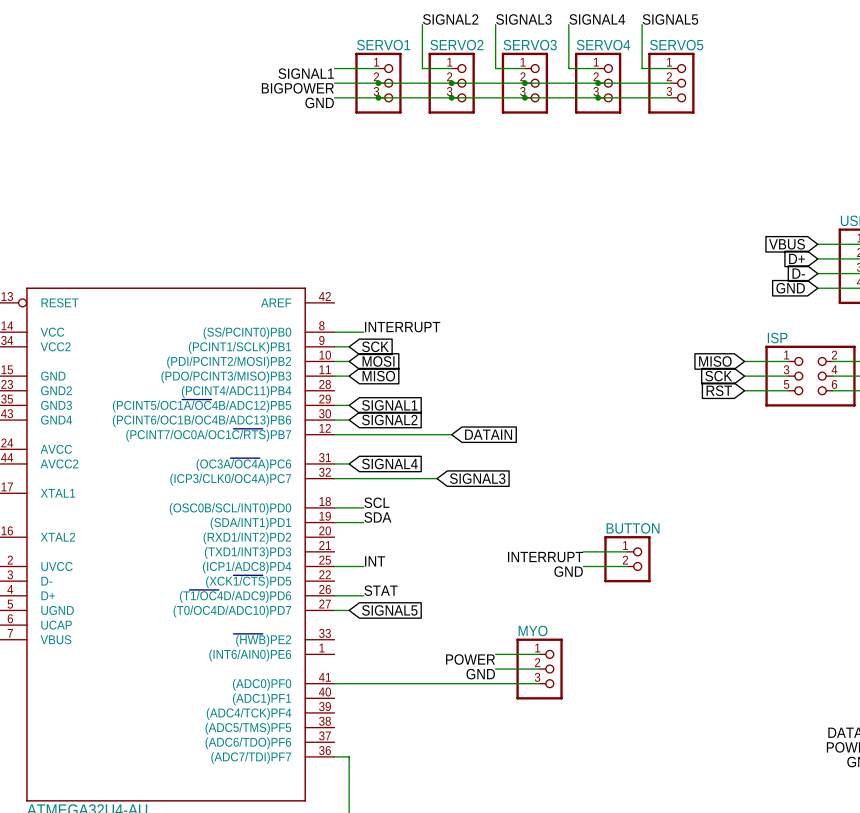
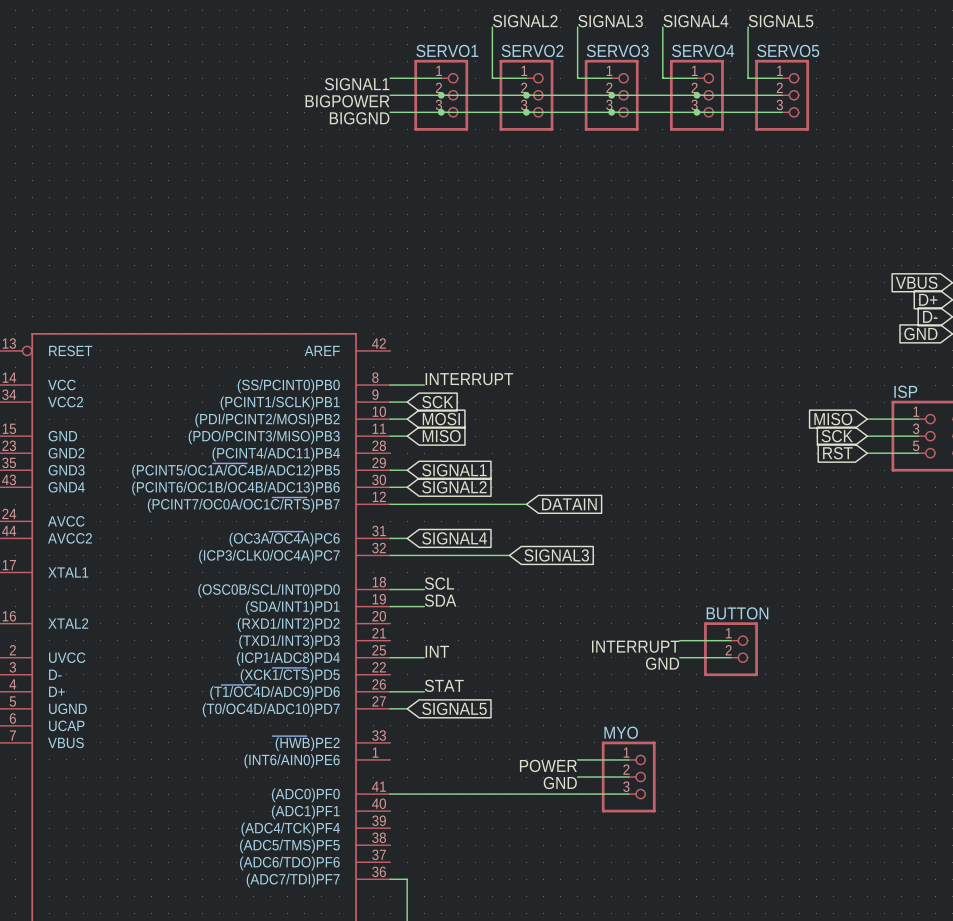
label: GND (319, 102) -> BIGGND (359, 118)

